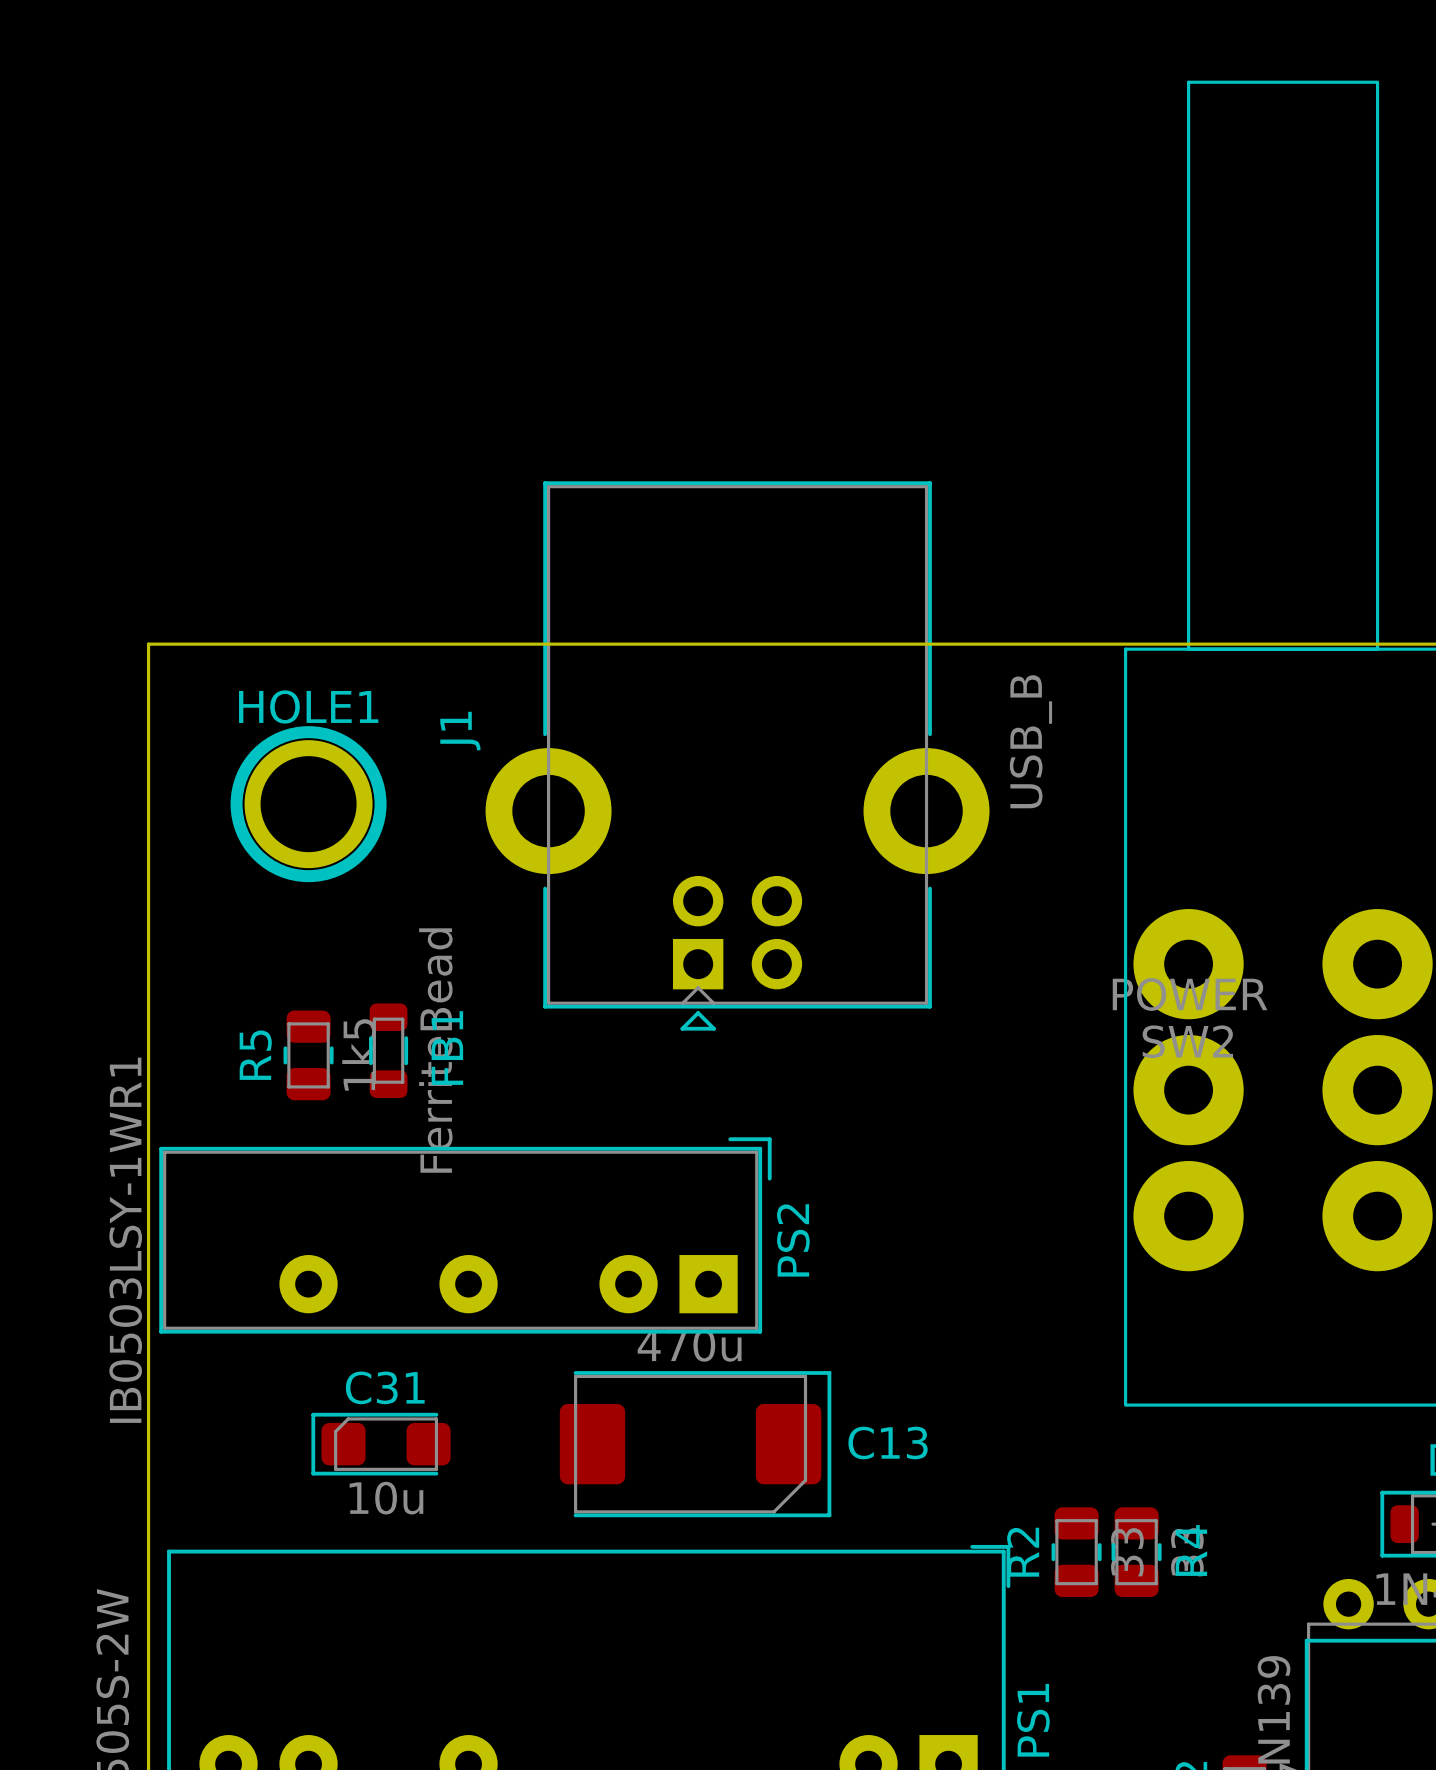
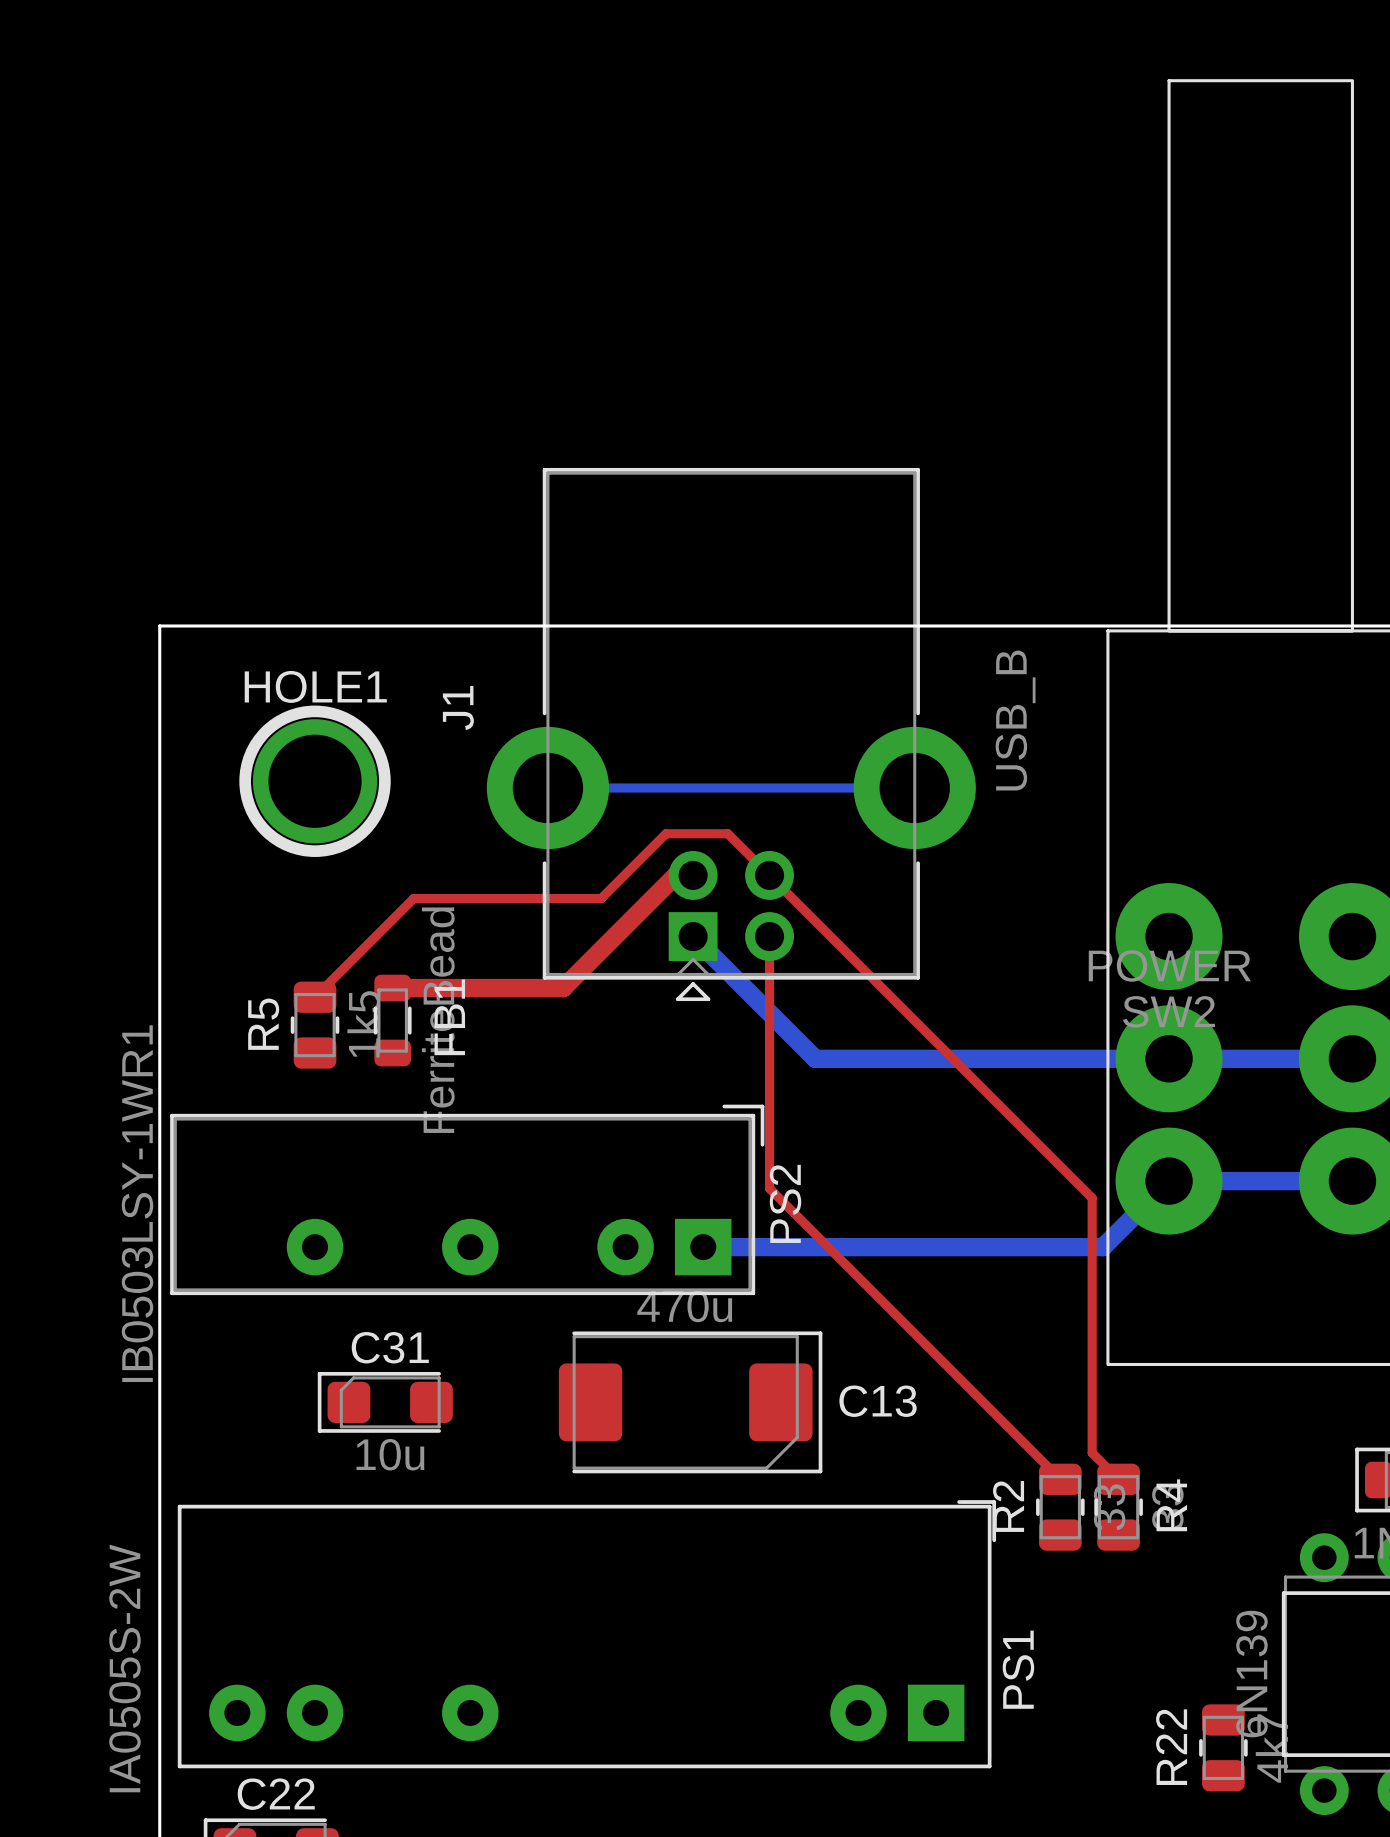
bottom track: none -> (547, 788) (914, 788)
top track: none -> (693, 875) (675, 875) (563, 988) (392, 988)
bottom track: none -> (693, 936) (815, 1058) (1352, 1058)
top track: none -> (769, 936) (769, 1188) (1060, 1479)
top track: none -> (315, 997) (413, 898) (601, 898) (665, 833) (727, 833) (1092, 1198) (1092, 1452) (1118, 1479)
bottom track: none -> (1352, 1181) (1169, 1181) (1103, 1247) (703, 1247)

